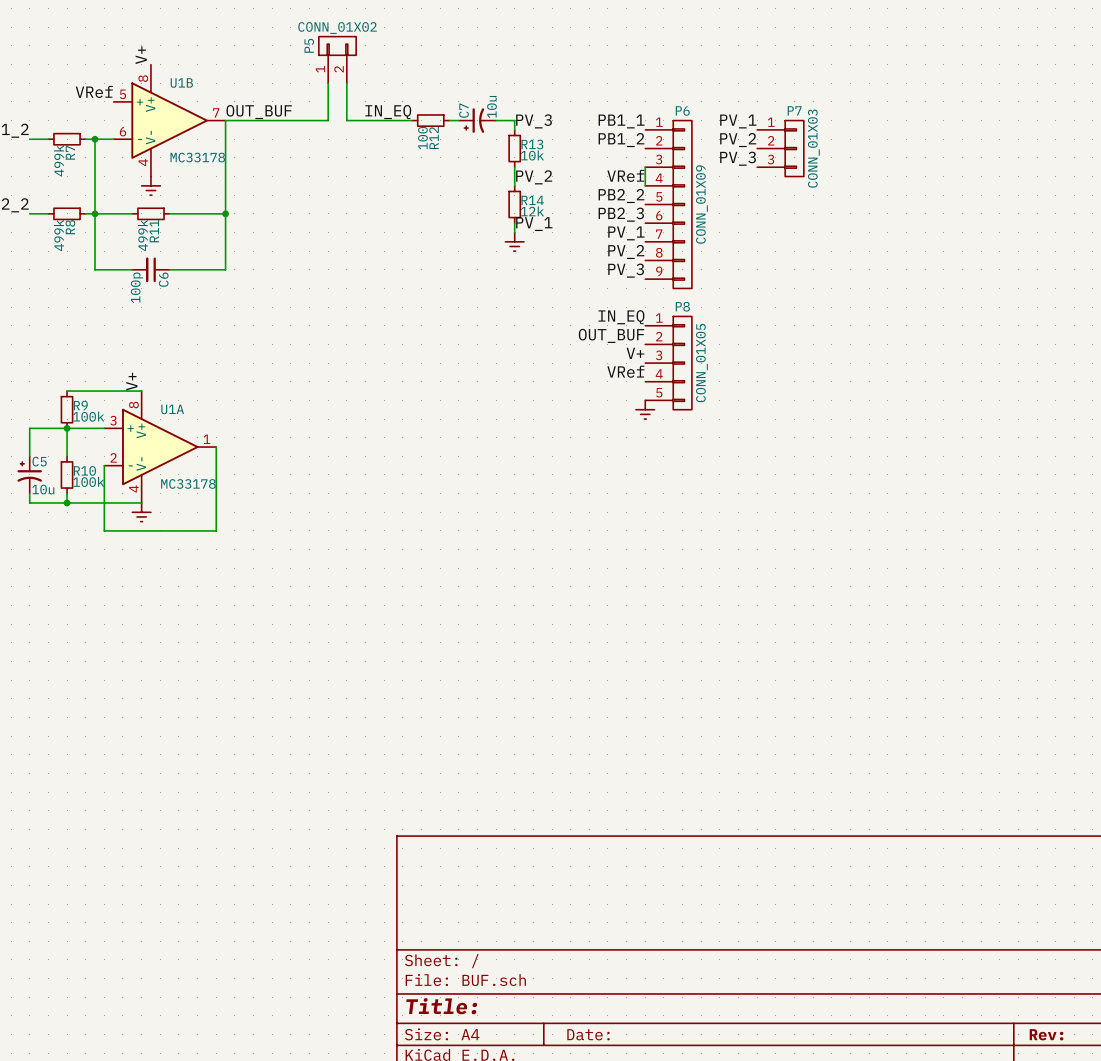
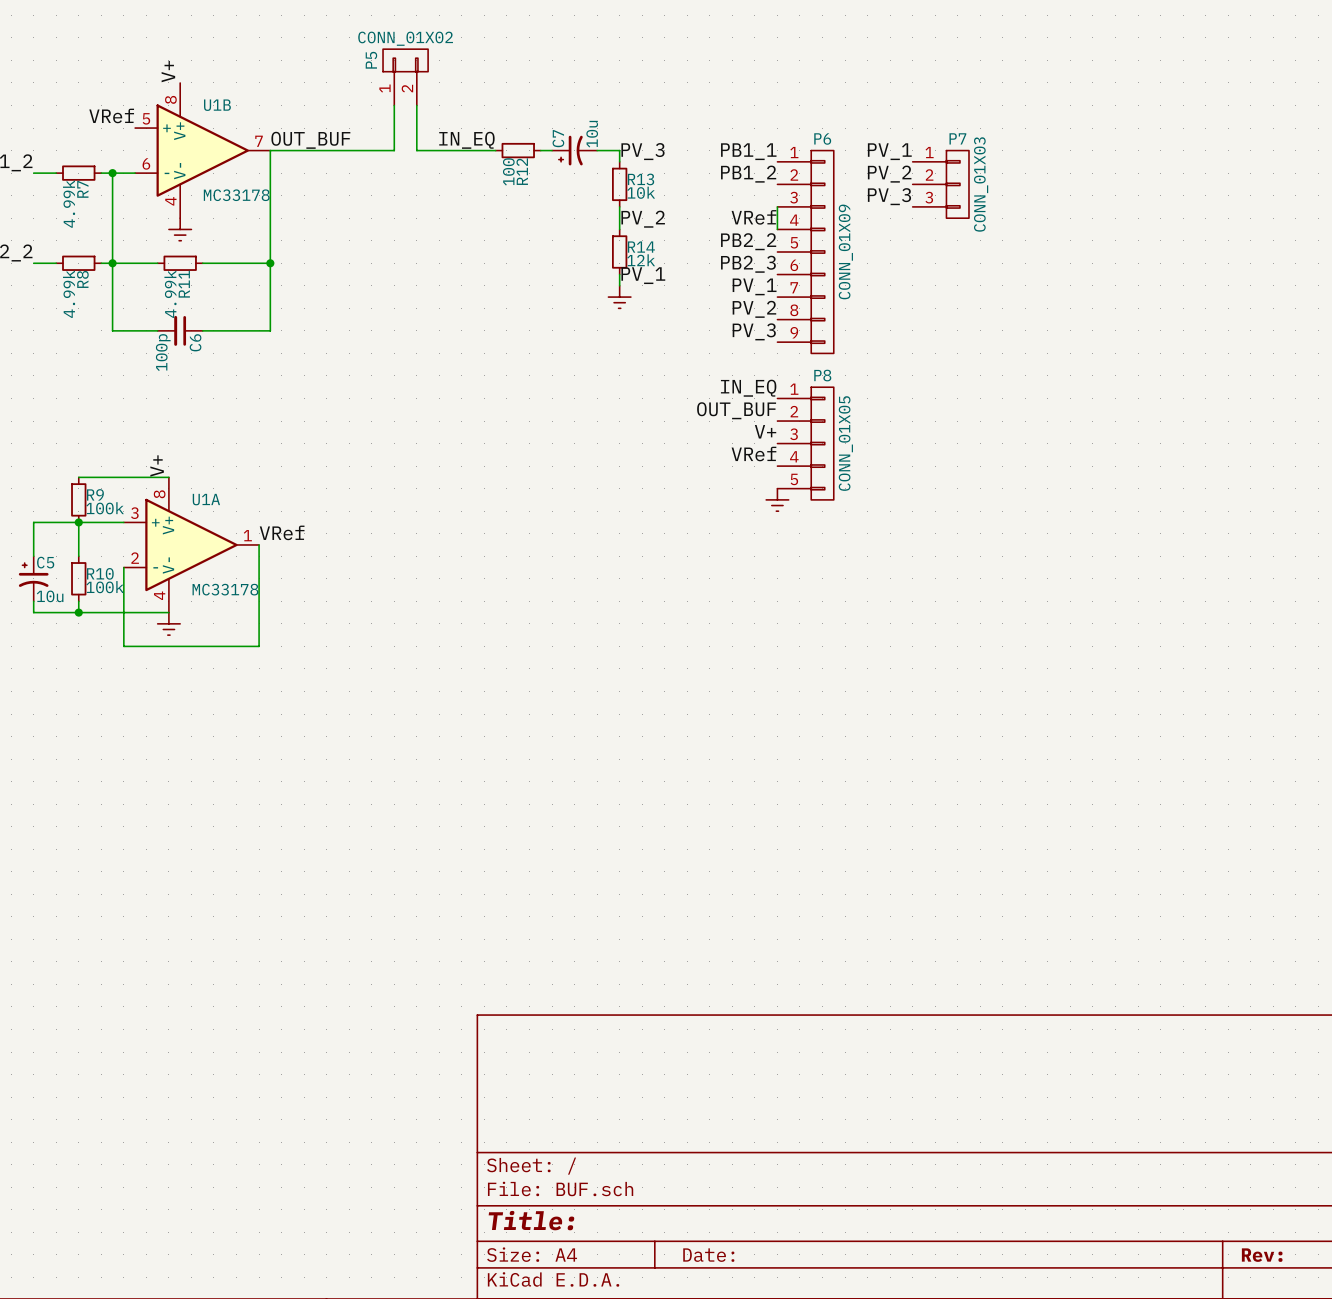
R7 value: 499k (58, 160) -> 4.99k (69, 204)
R8 value: 499k (58, 235) -> 4.99k (69, 294)
R11 value: 499k (142, 235) -> 4.99k (170, 294)
label: none -> VRef (282, 532)

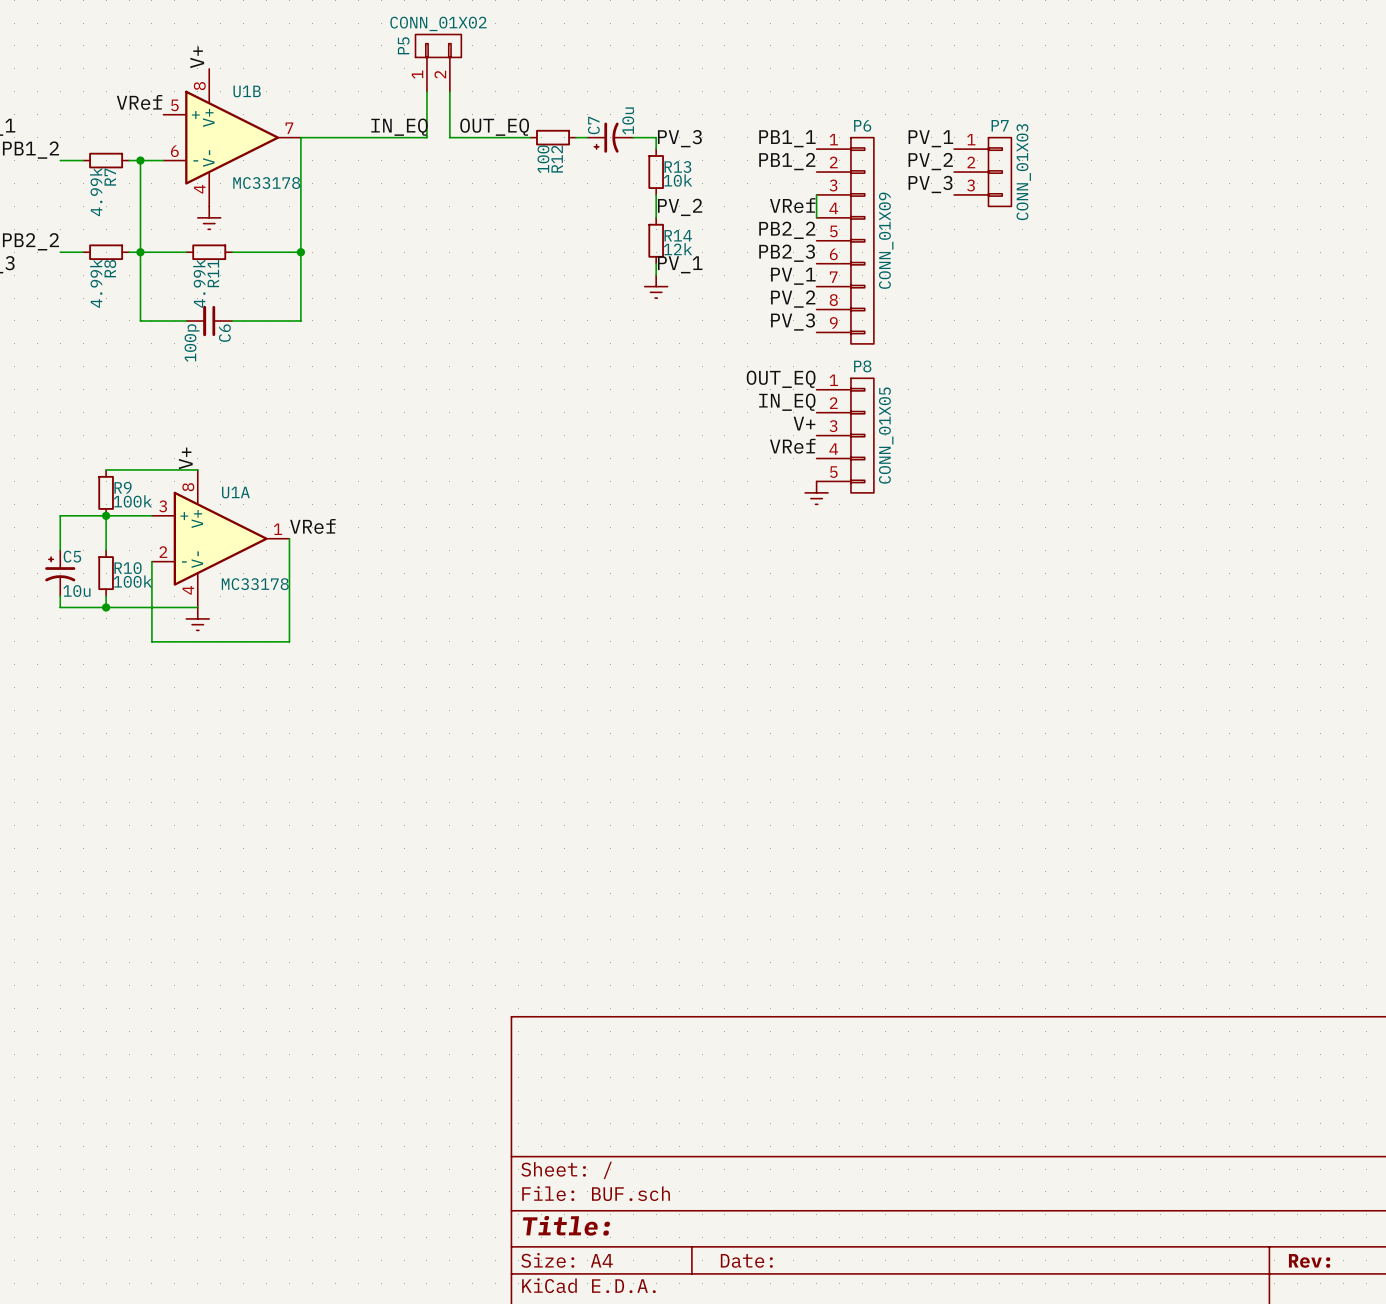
label: OUT_BUF (310, 140) -> none
label: none -> IN_EQ (399, 127)
label: IN_EQ (466, 140) -> OUT_EQ (494, 127)
label: IN_EQ (748, 388) -> OUT_EQ (781, 379)
label: OUT_BUF (736, 410) -> IN_EQ (787, 402)

